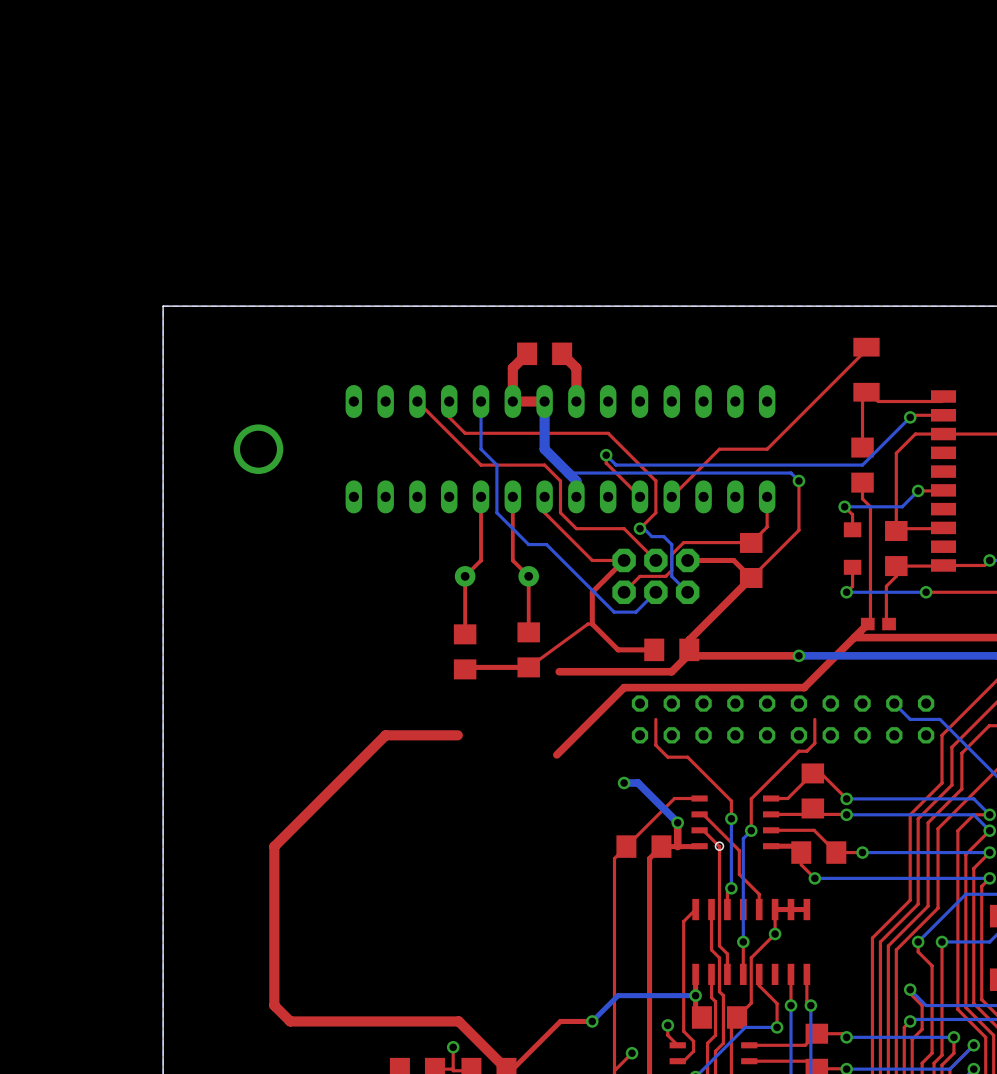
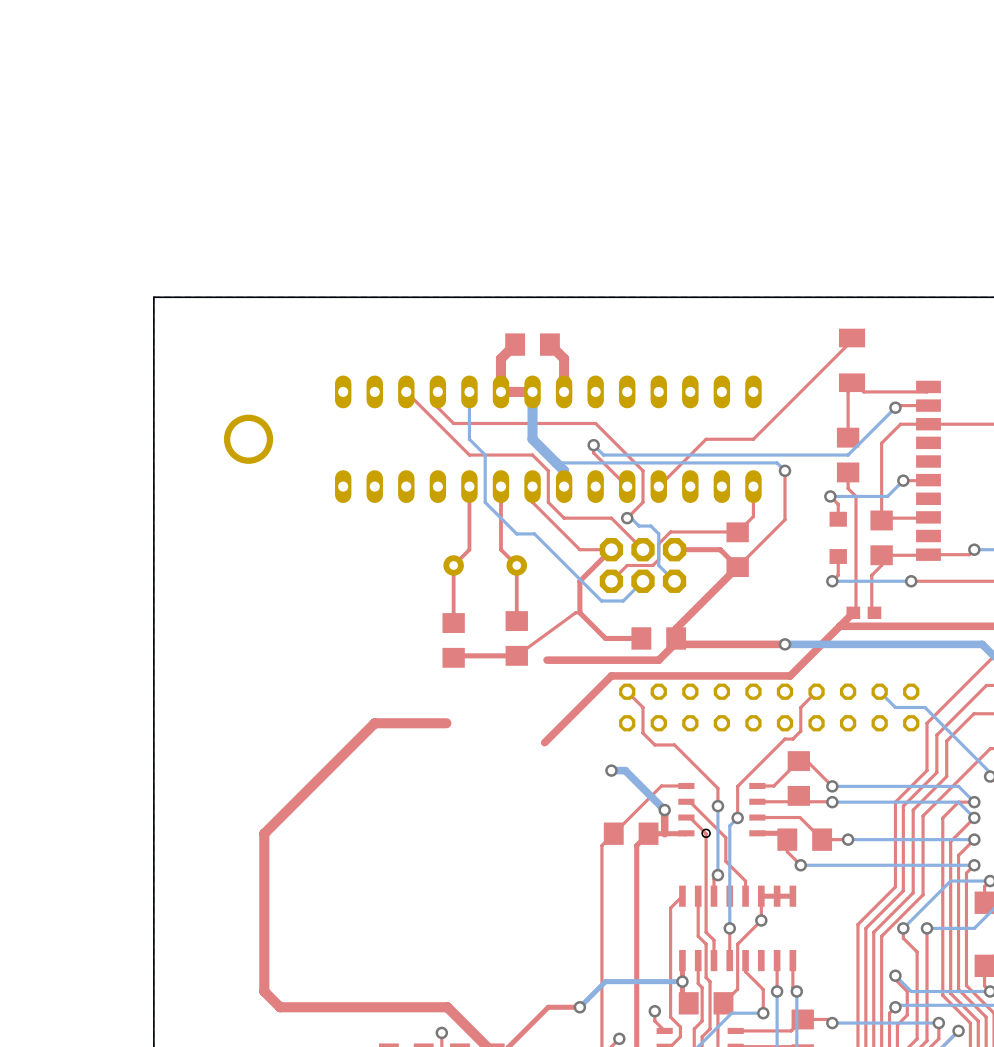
top track: none -> (627, 691) (642, 707)
top track: none -> (816, 691) (800, 707)

